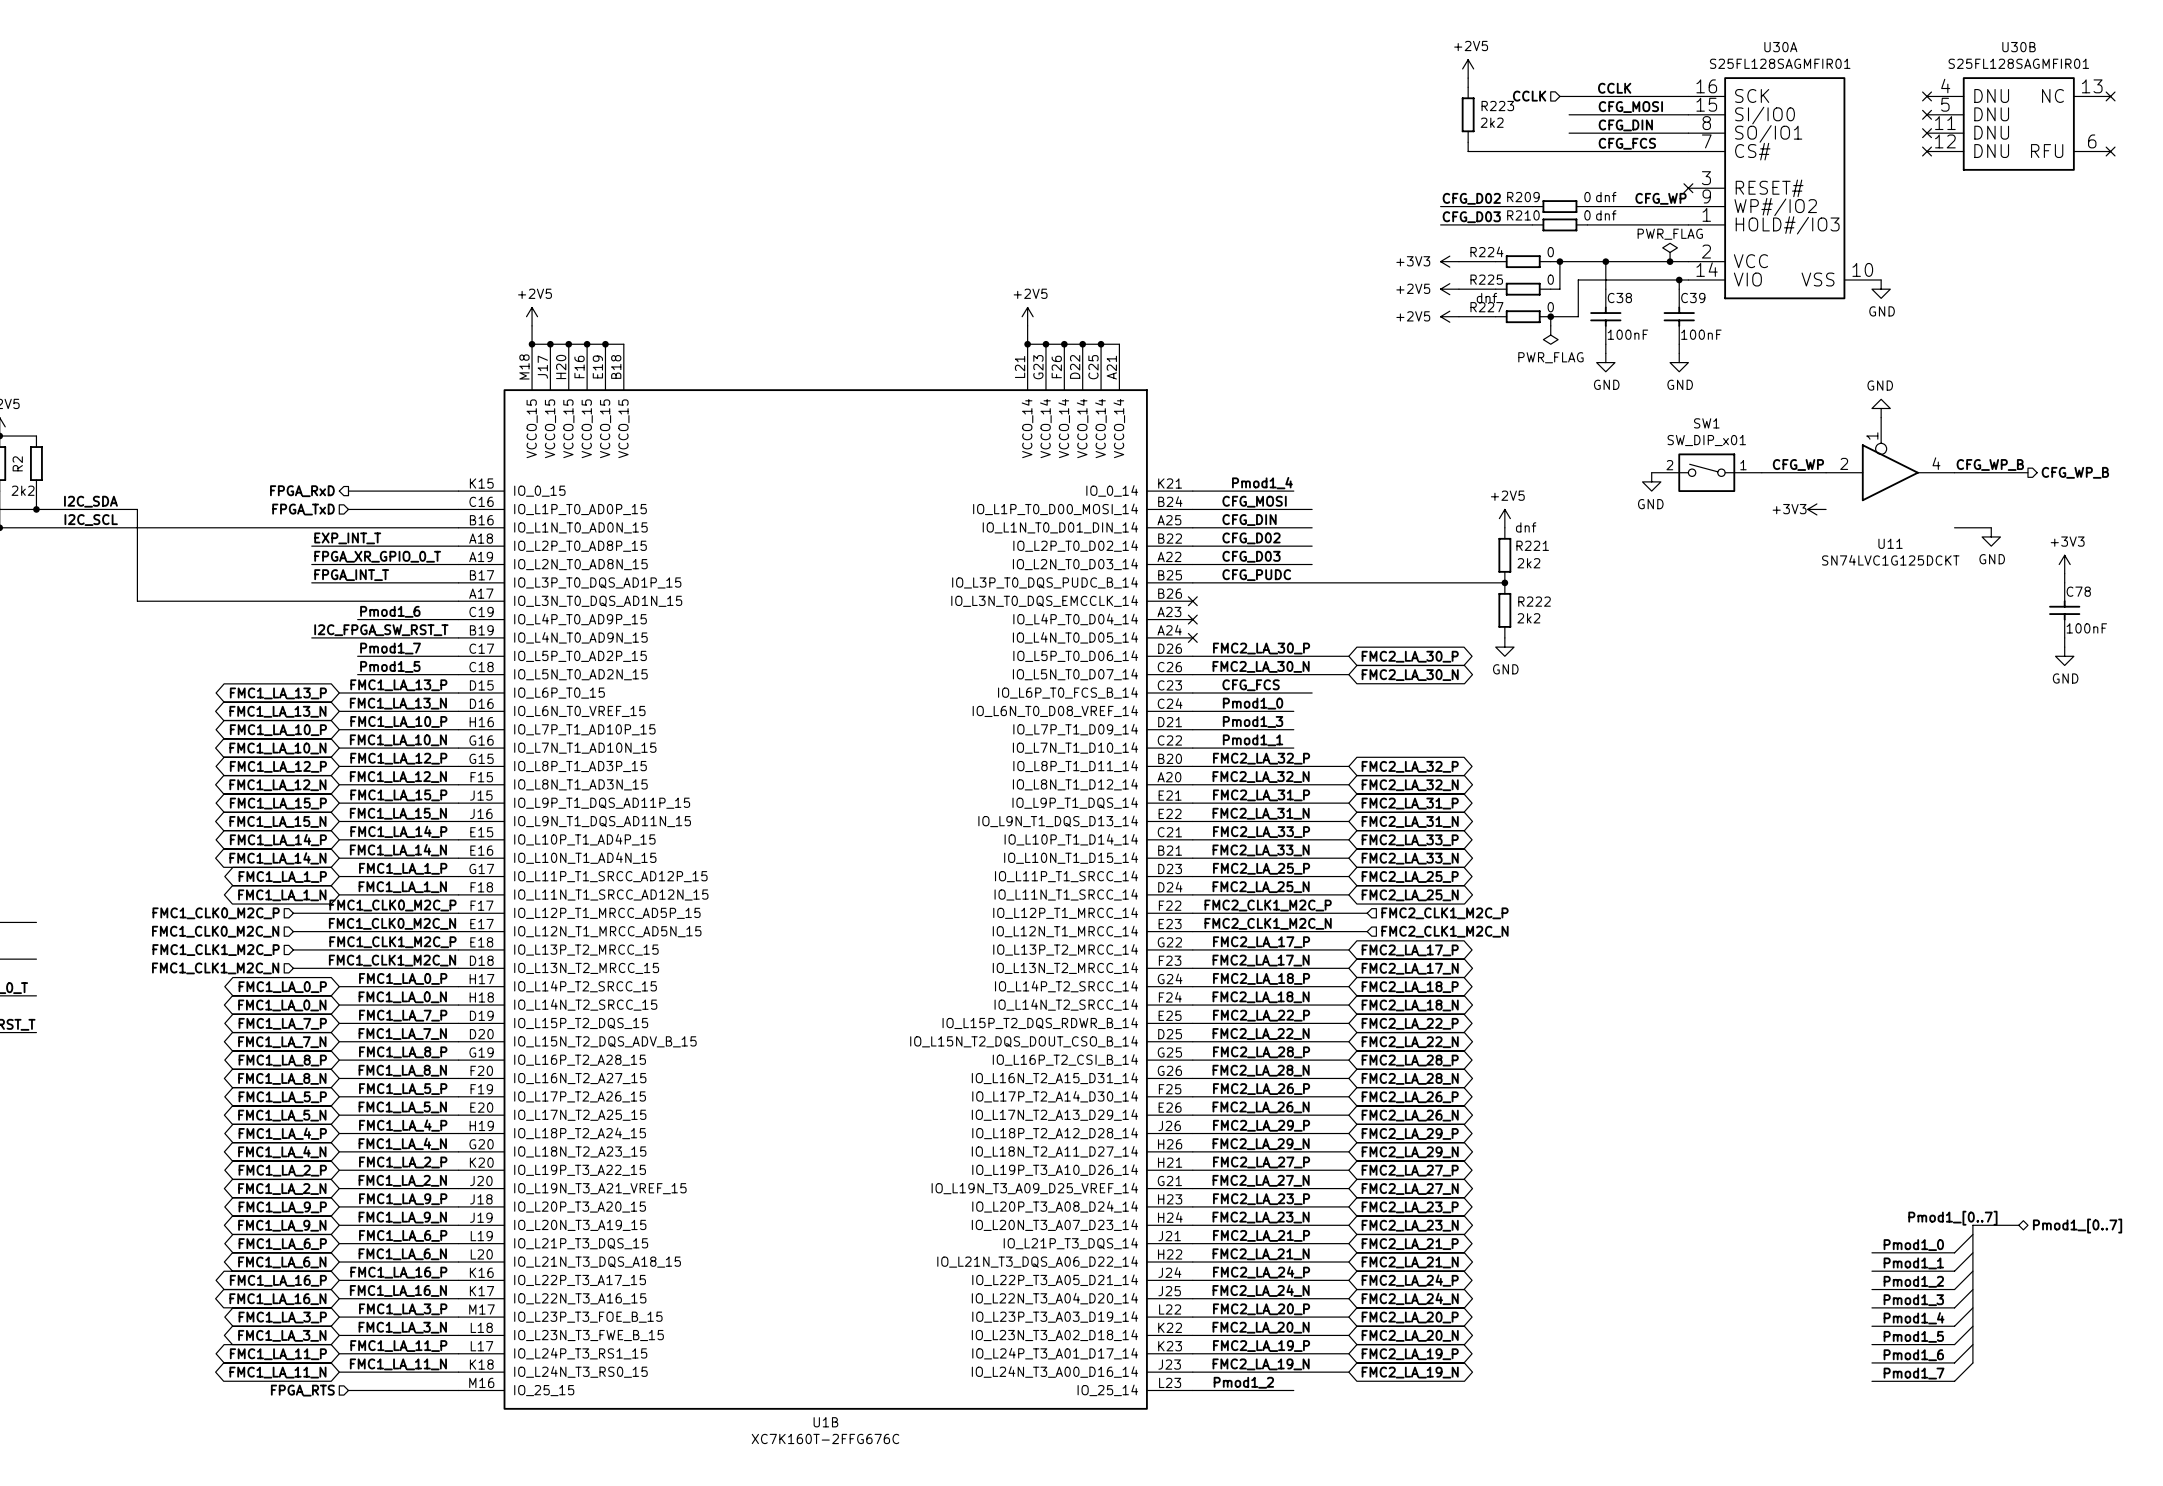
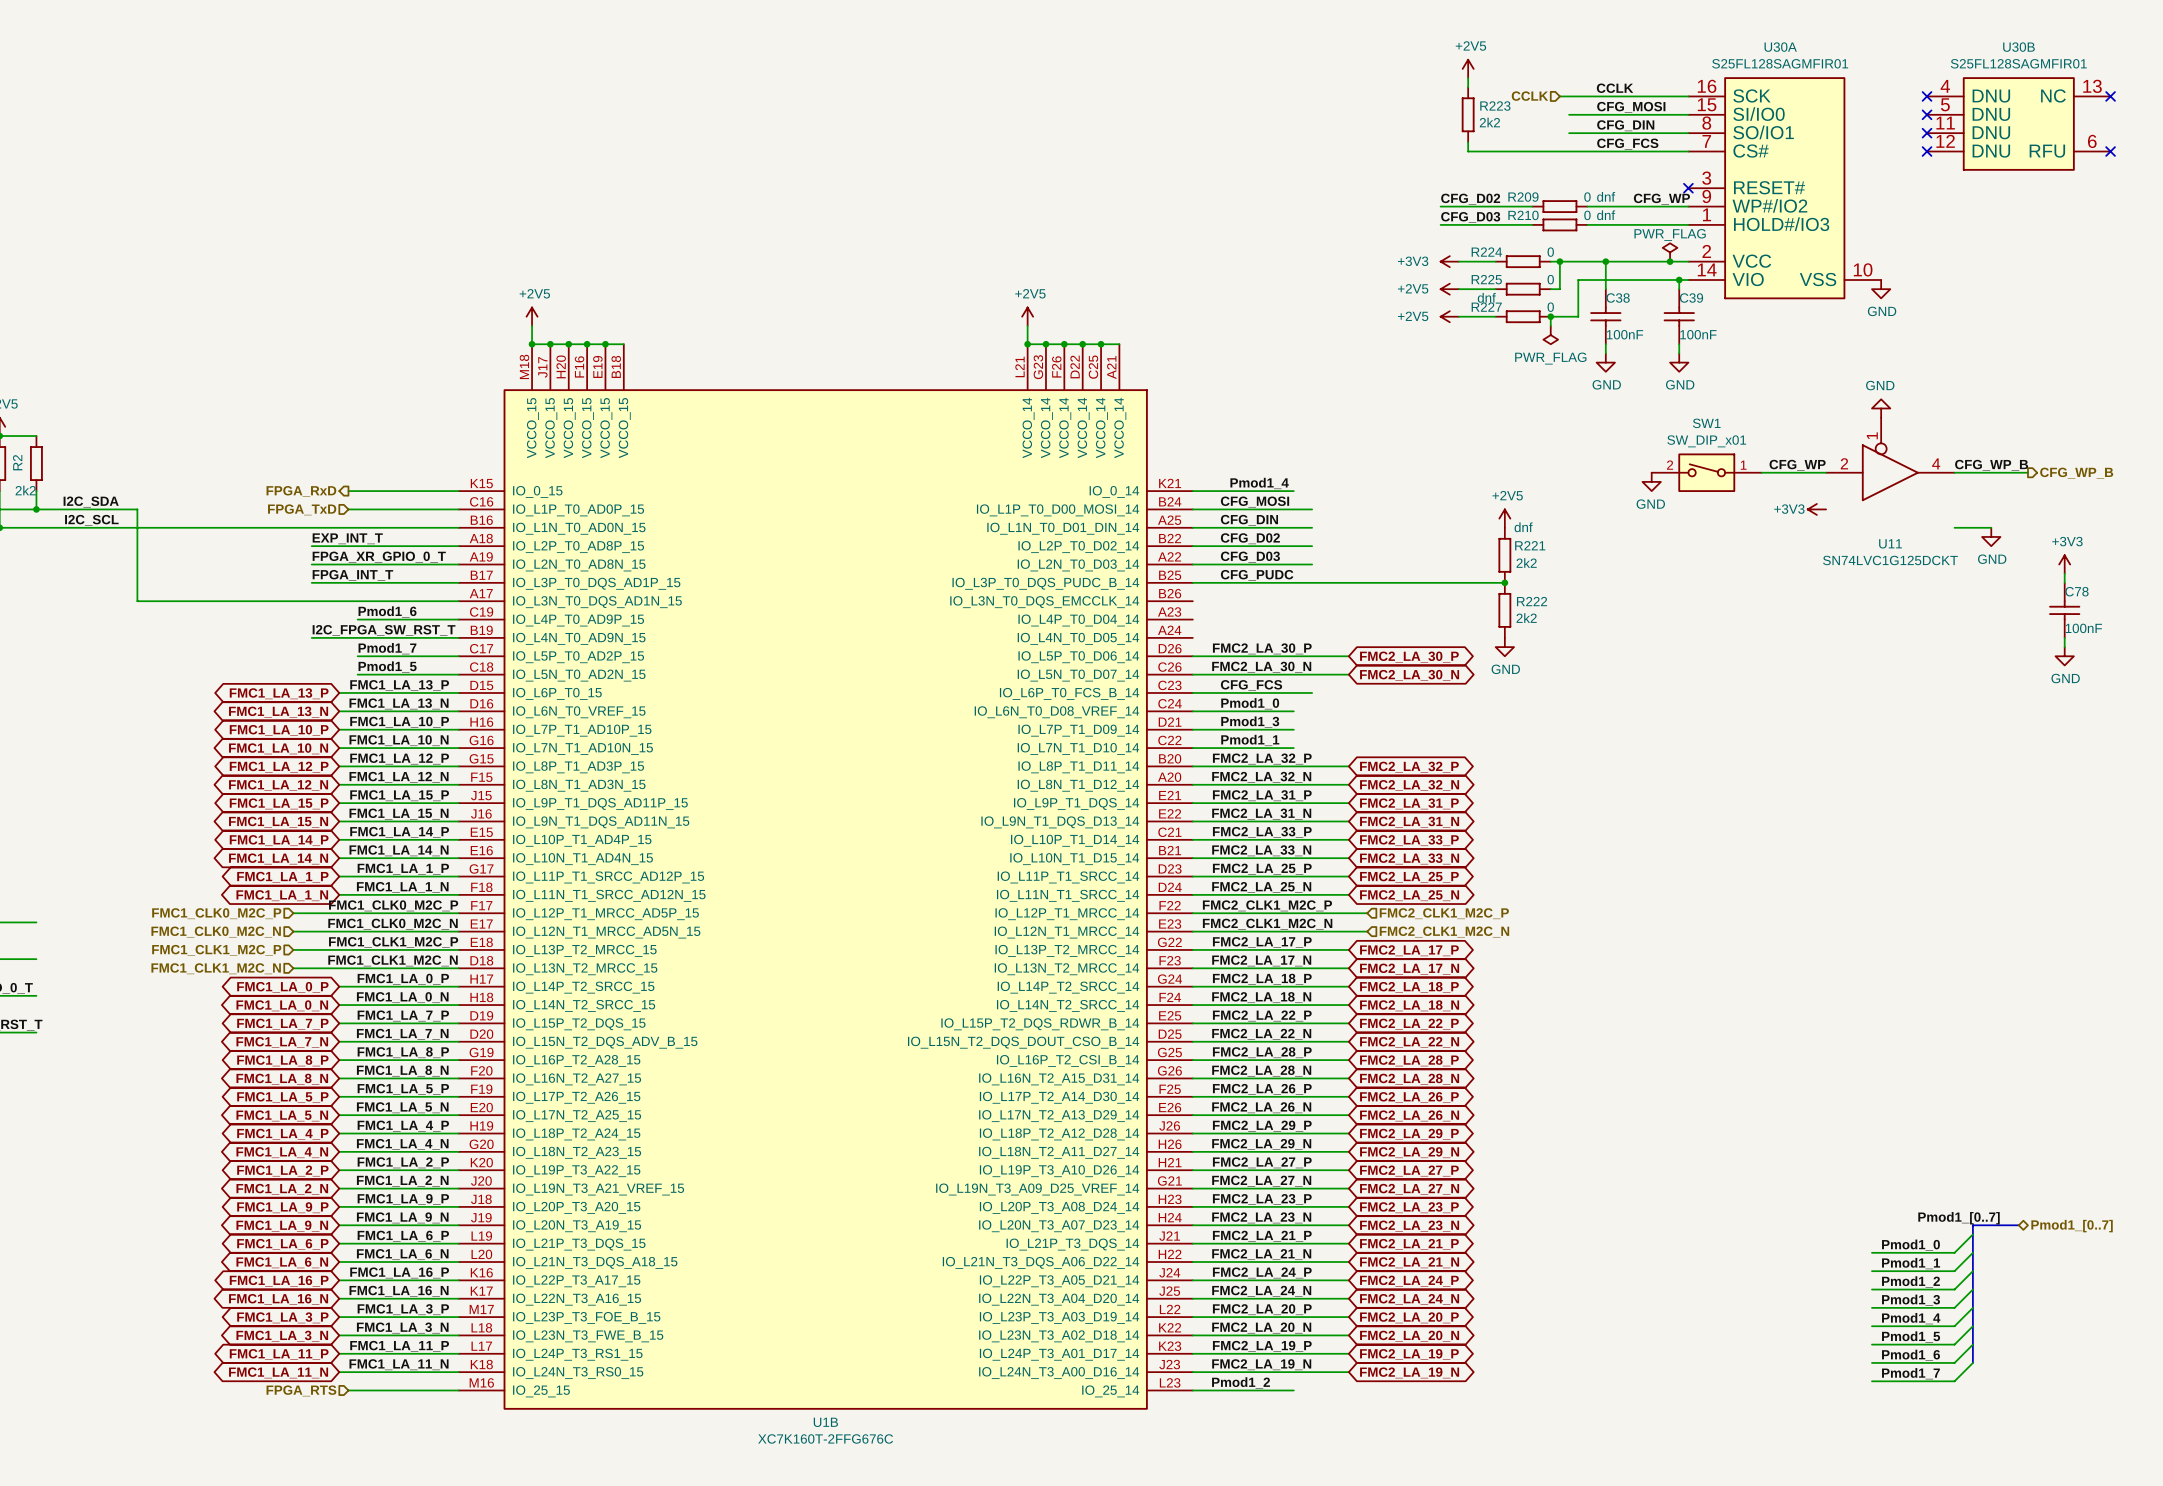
no-connect mark: (1192, 601) -> none
no-connect mark: (1192, 619) -> none
no-connect mark: (1192, 637) -> none

